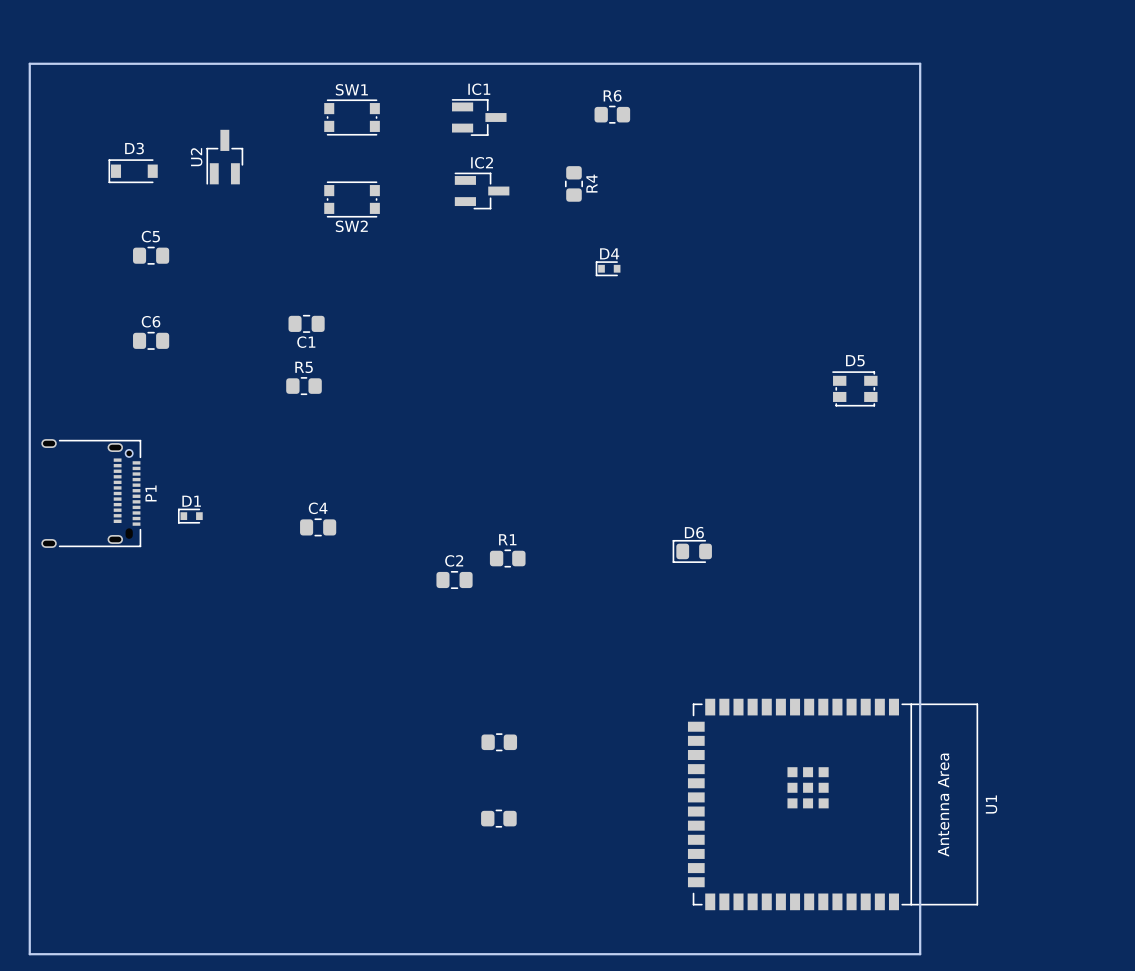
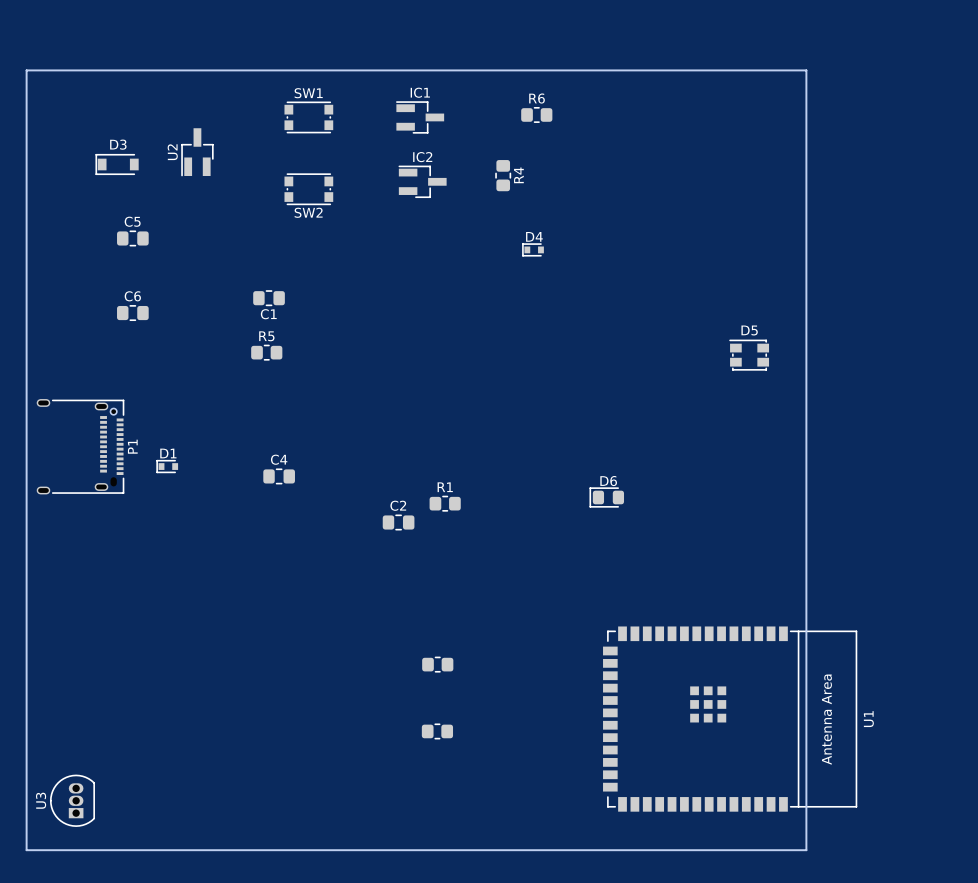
U3: none -> (72, 800)

